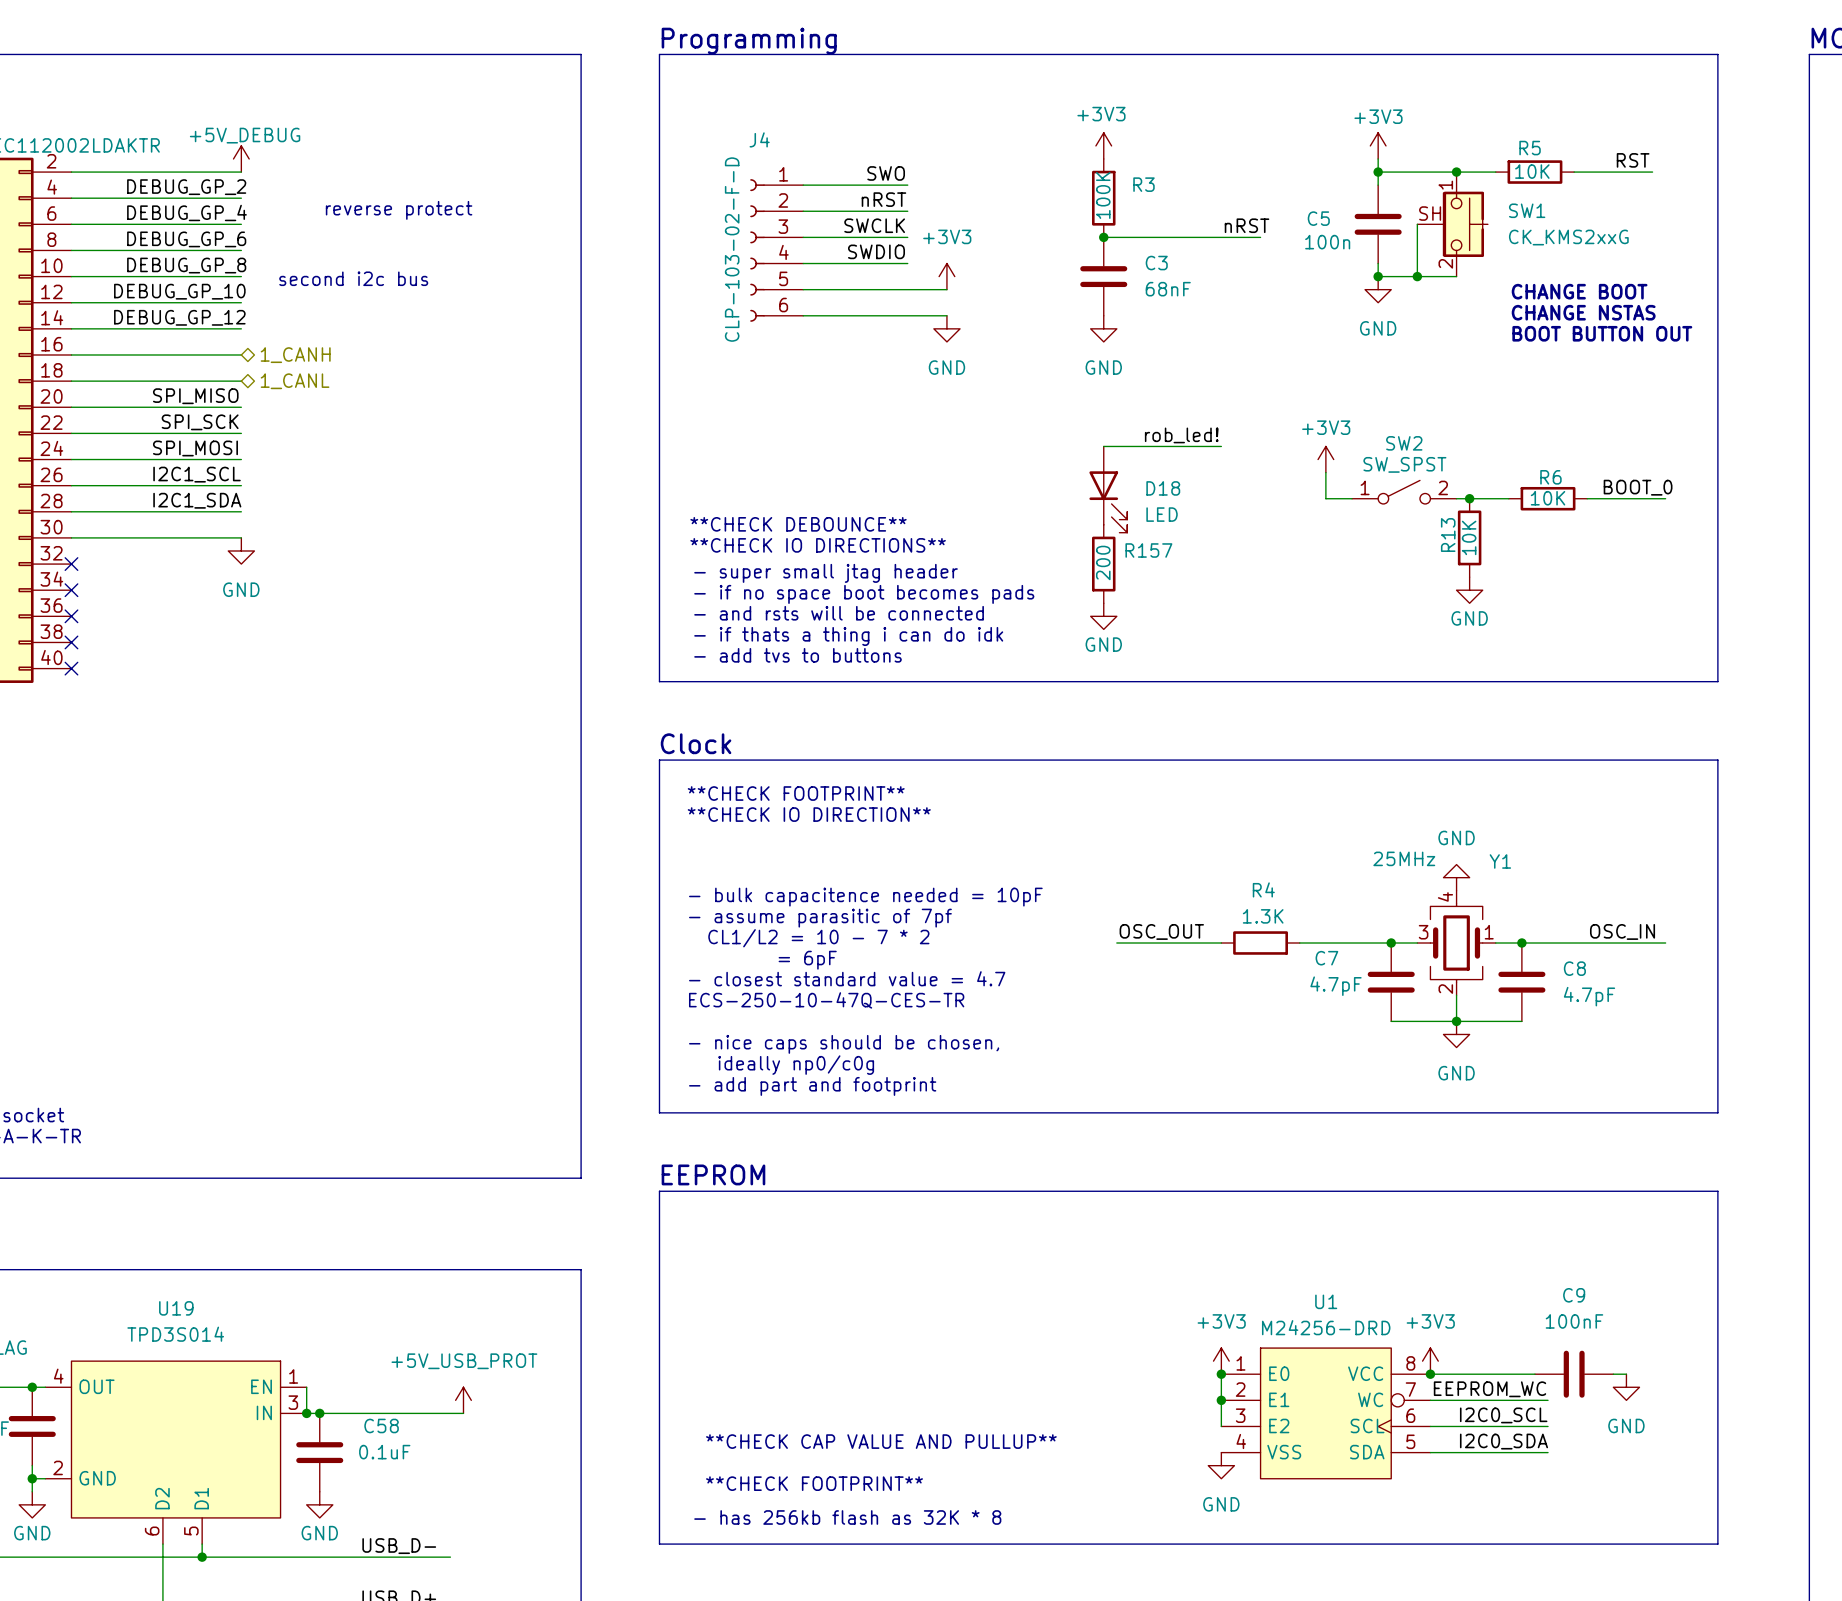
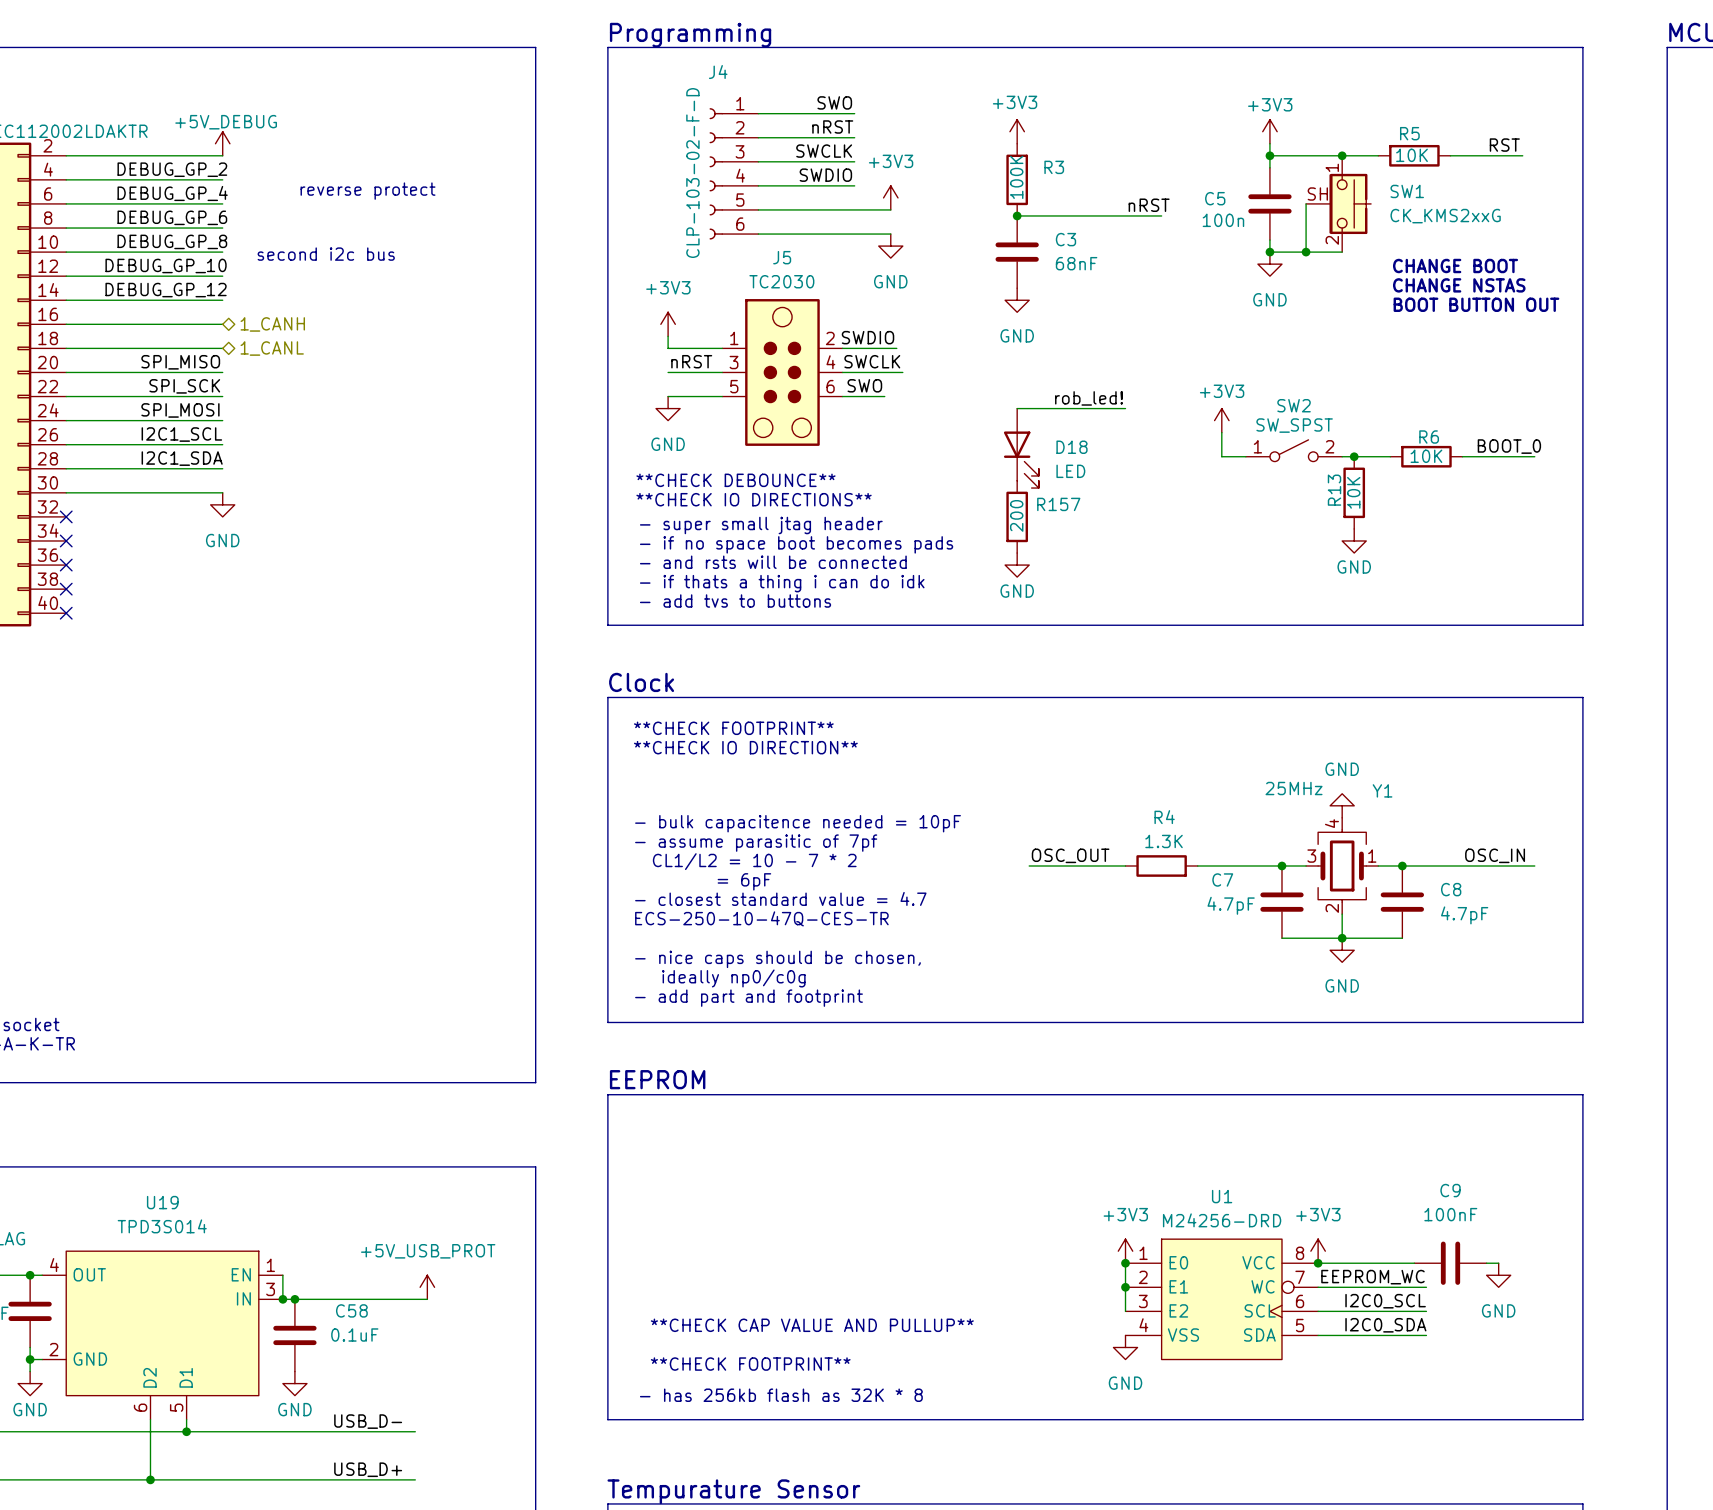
label position: SWO (886, 173) -> SWO (834, 102)
wire: (803, 185) (907, 185) -> (758, 113) (854, 113)
label position: nRST (883, 199) -> nRST (832, 126)
wire: (803, 211) (907, 211) -> (758, 137) (854, 137)
label position: SWCLK (874, 225) -> SWCLK (824, 151)
wire: (803, 237) (907, 237) -> (758, 161) (854, 161)
J4 position: (776, 250) -> (733, 173)
label position: SWDIO (876, 251) -> SWDIO (825, 175)
wire: (803, 263) (907, 263) -> (758, 185) (854, 185)
power symbol position: +3V3 (946, 276) -> +3V3 (890, 197)
wire: (803, 289) (946, 289) -> (758, 209) (890, 209)
wire: (803, 315) (946, 315) -> (758, 234) (890, 234)
power symbol position: GND (946, 328) -> GND (890, 246)
power symbol: none -> +3V3 (668, 324)
wire: none -> (668, 336) (668, 348) (722, 348)
label: none -> SWDIO (868, 337)
wire: none -> (842, 348) (896, 348)
label: none -> nRST (691, 361)
label: none -> SWCLK (872, 361)
wire: none -> (668, 372) (722, 372)
J5: none -> TC2030 (782, 372)
wire: none -> (842, 372) (902, 372)
label: none -> SWO (864, 385)
wire: none -> (668, 396) (722, 396)
wire: none -> (842, 396) (884, 396)
power symbol: none -> GND (668, 408)

